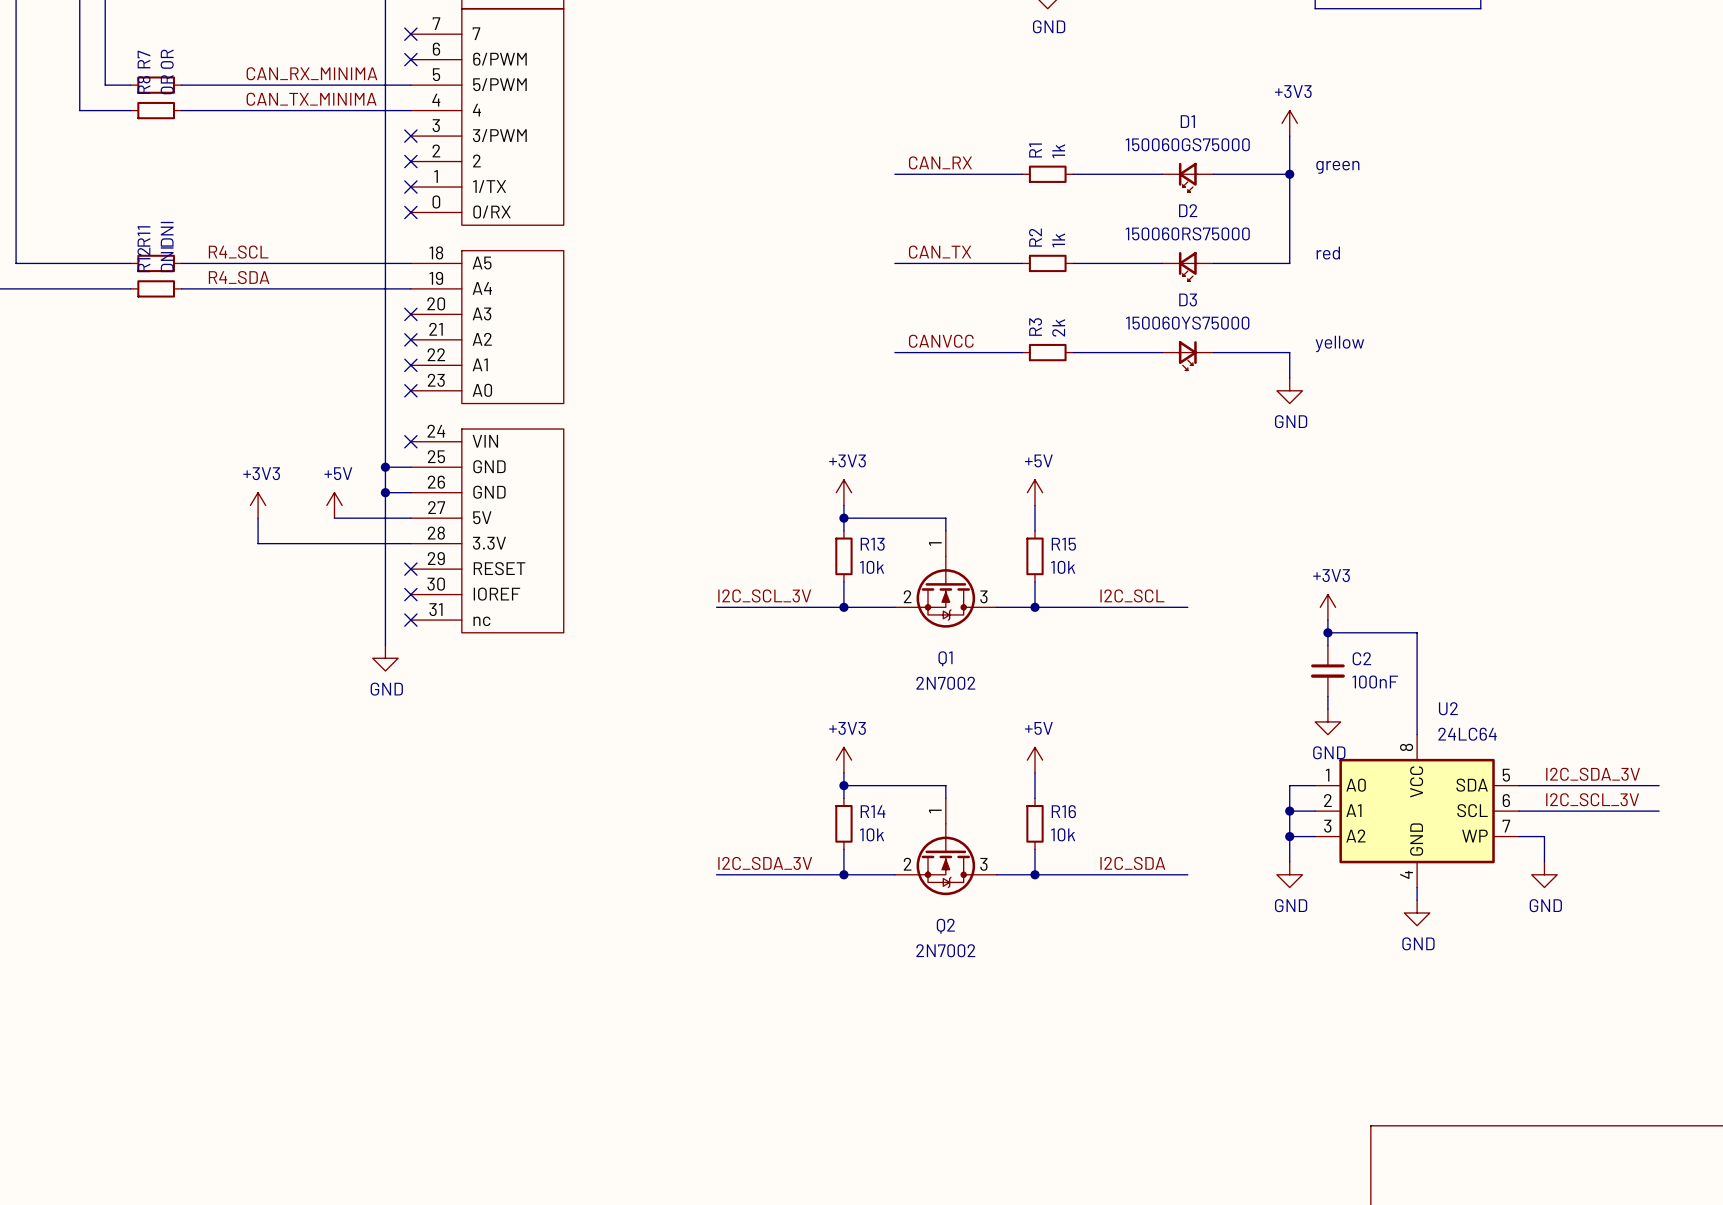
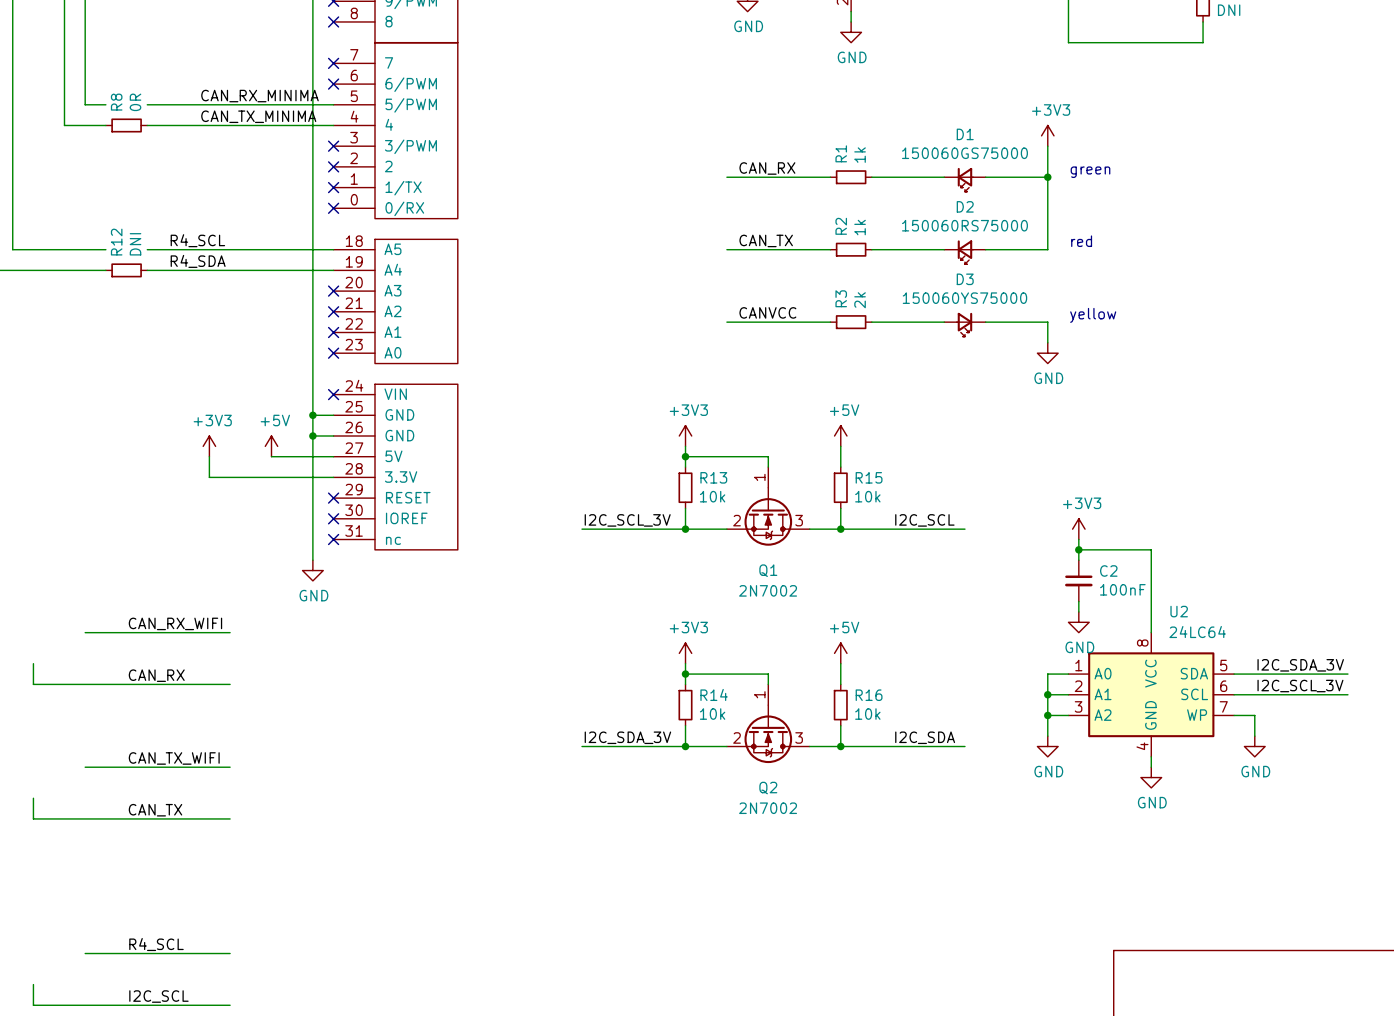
R7: 0R (156, 85) -> none
R11: DNI (156, 263) -> none
label: none -> CAN_RX_WIFI (175, 623)
wire: none -> (85, 632) (230, 632)
wire: none -> (33, 663) (33, 684) (230, 684)
label: none -> CAN_RX (156, 675)
label: none -> CAN_TX_WIFI (174, 758)
wire: none -> (85, 767) (230, 767)
wire: none -> (33, 798) (33, 818) (230, 818)
label: none -> CAN_TX (155, 810)
label: none -> R4_SCL (156, 944)
wire: none -> (85, 953) (230, 953)
wire: none -> (33, 984) (33, 1005) (230, 1005)
label: none -> I2C_SCL (158, 996)

